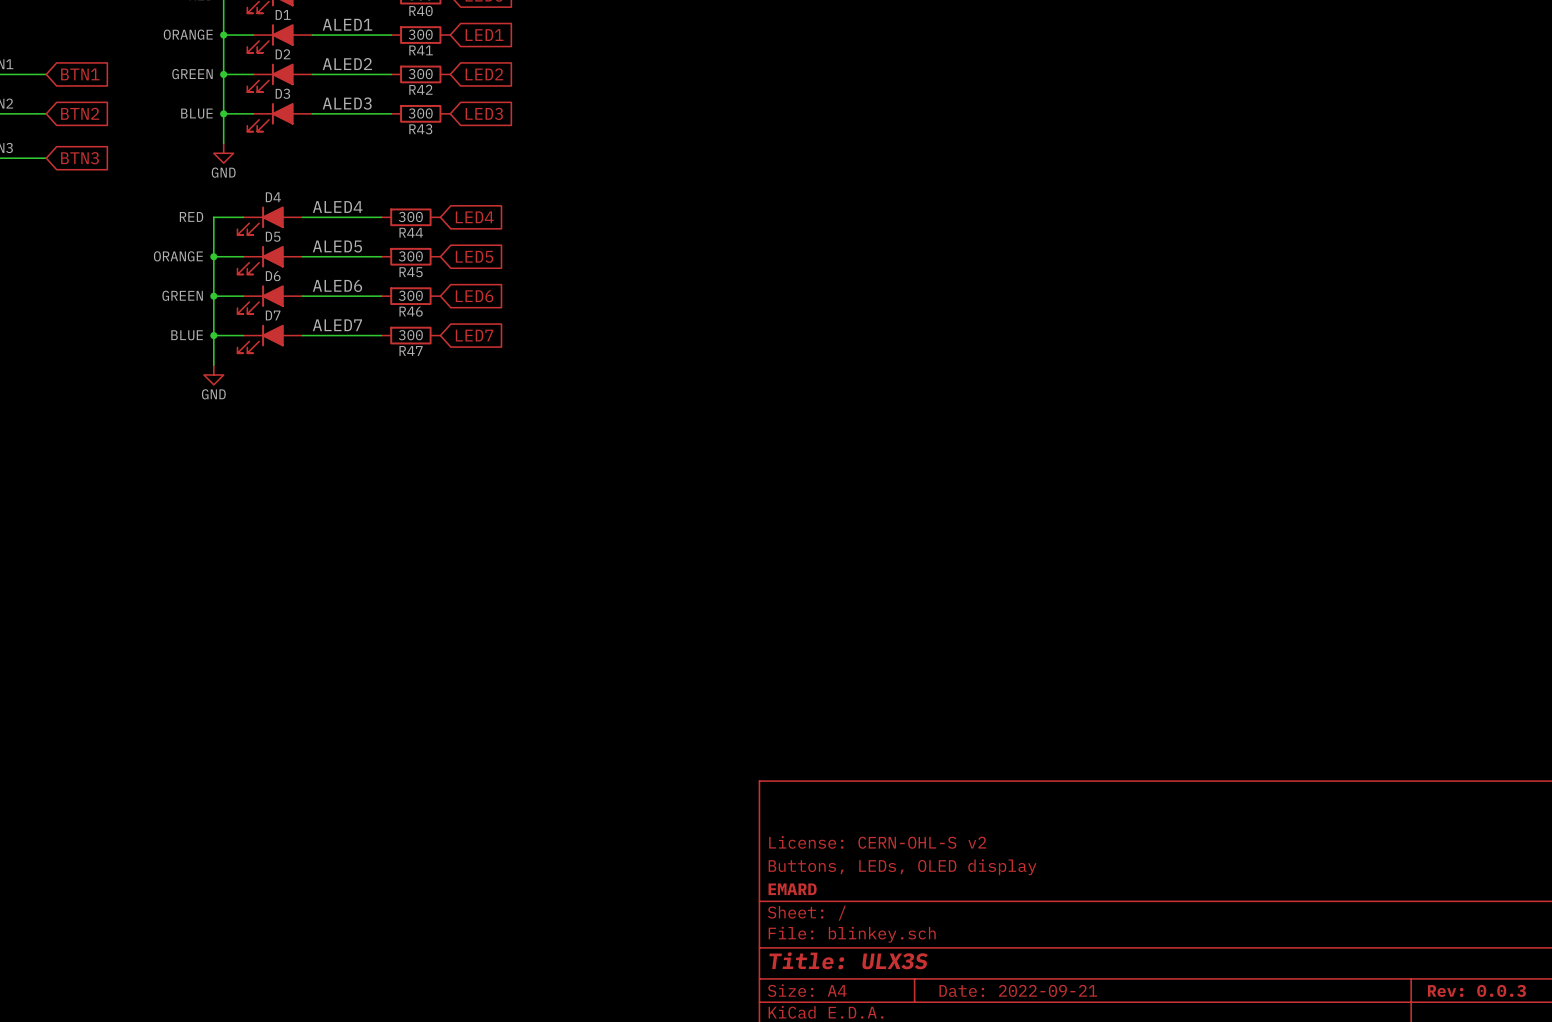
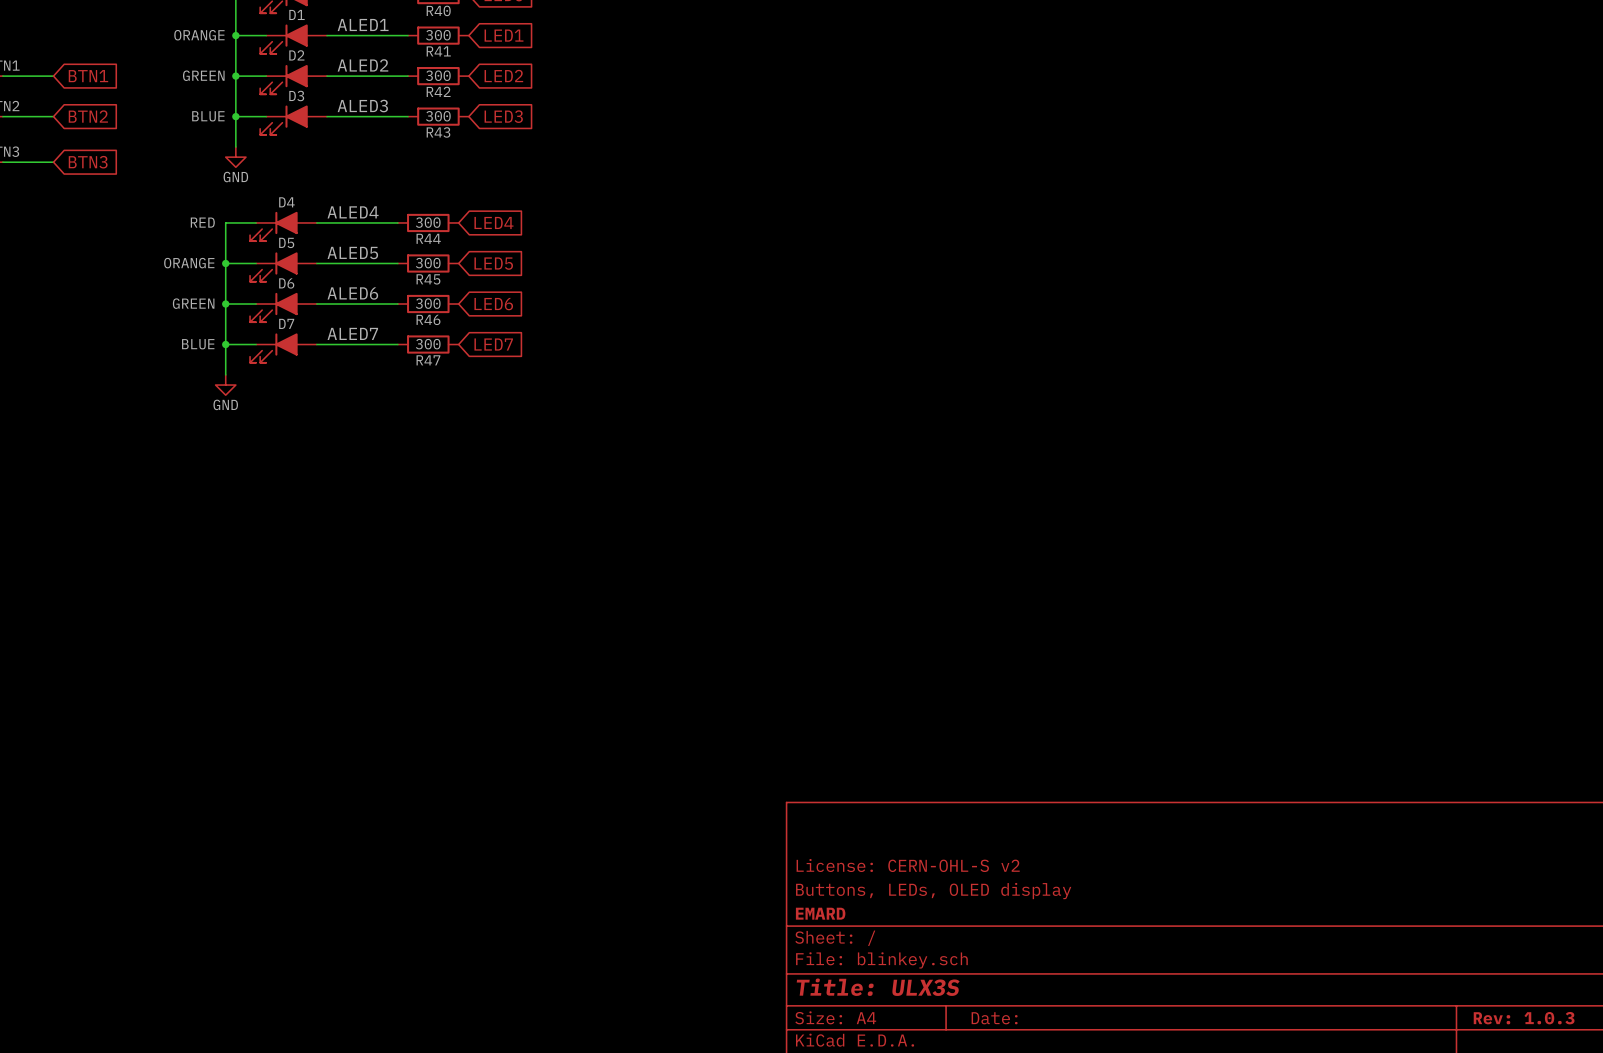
title block: Date: 2022-09-21 (1018, 990) -> Date: (994, 1018)
title block: Rev: 0.0.3 (1476, 990) -> Rev: 1.0.3 (1524, 1018)

